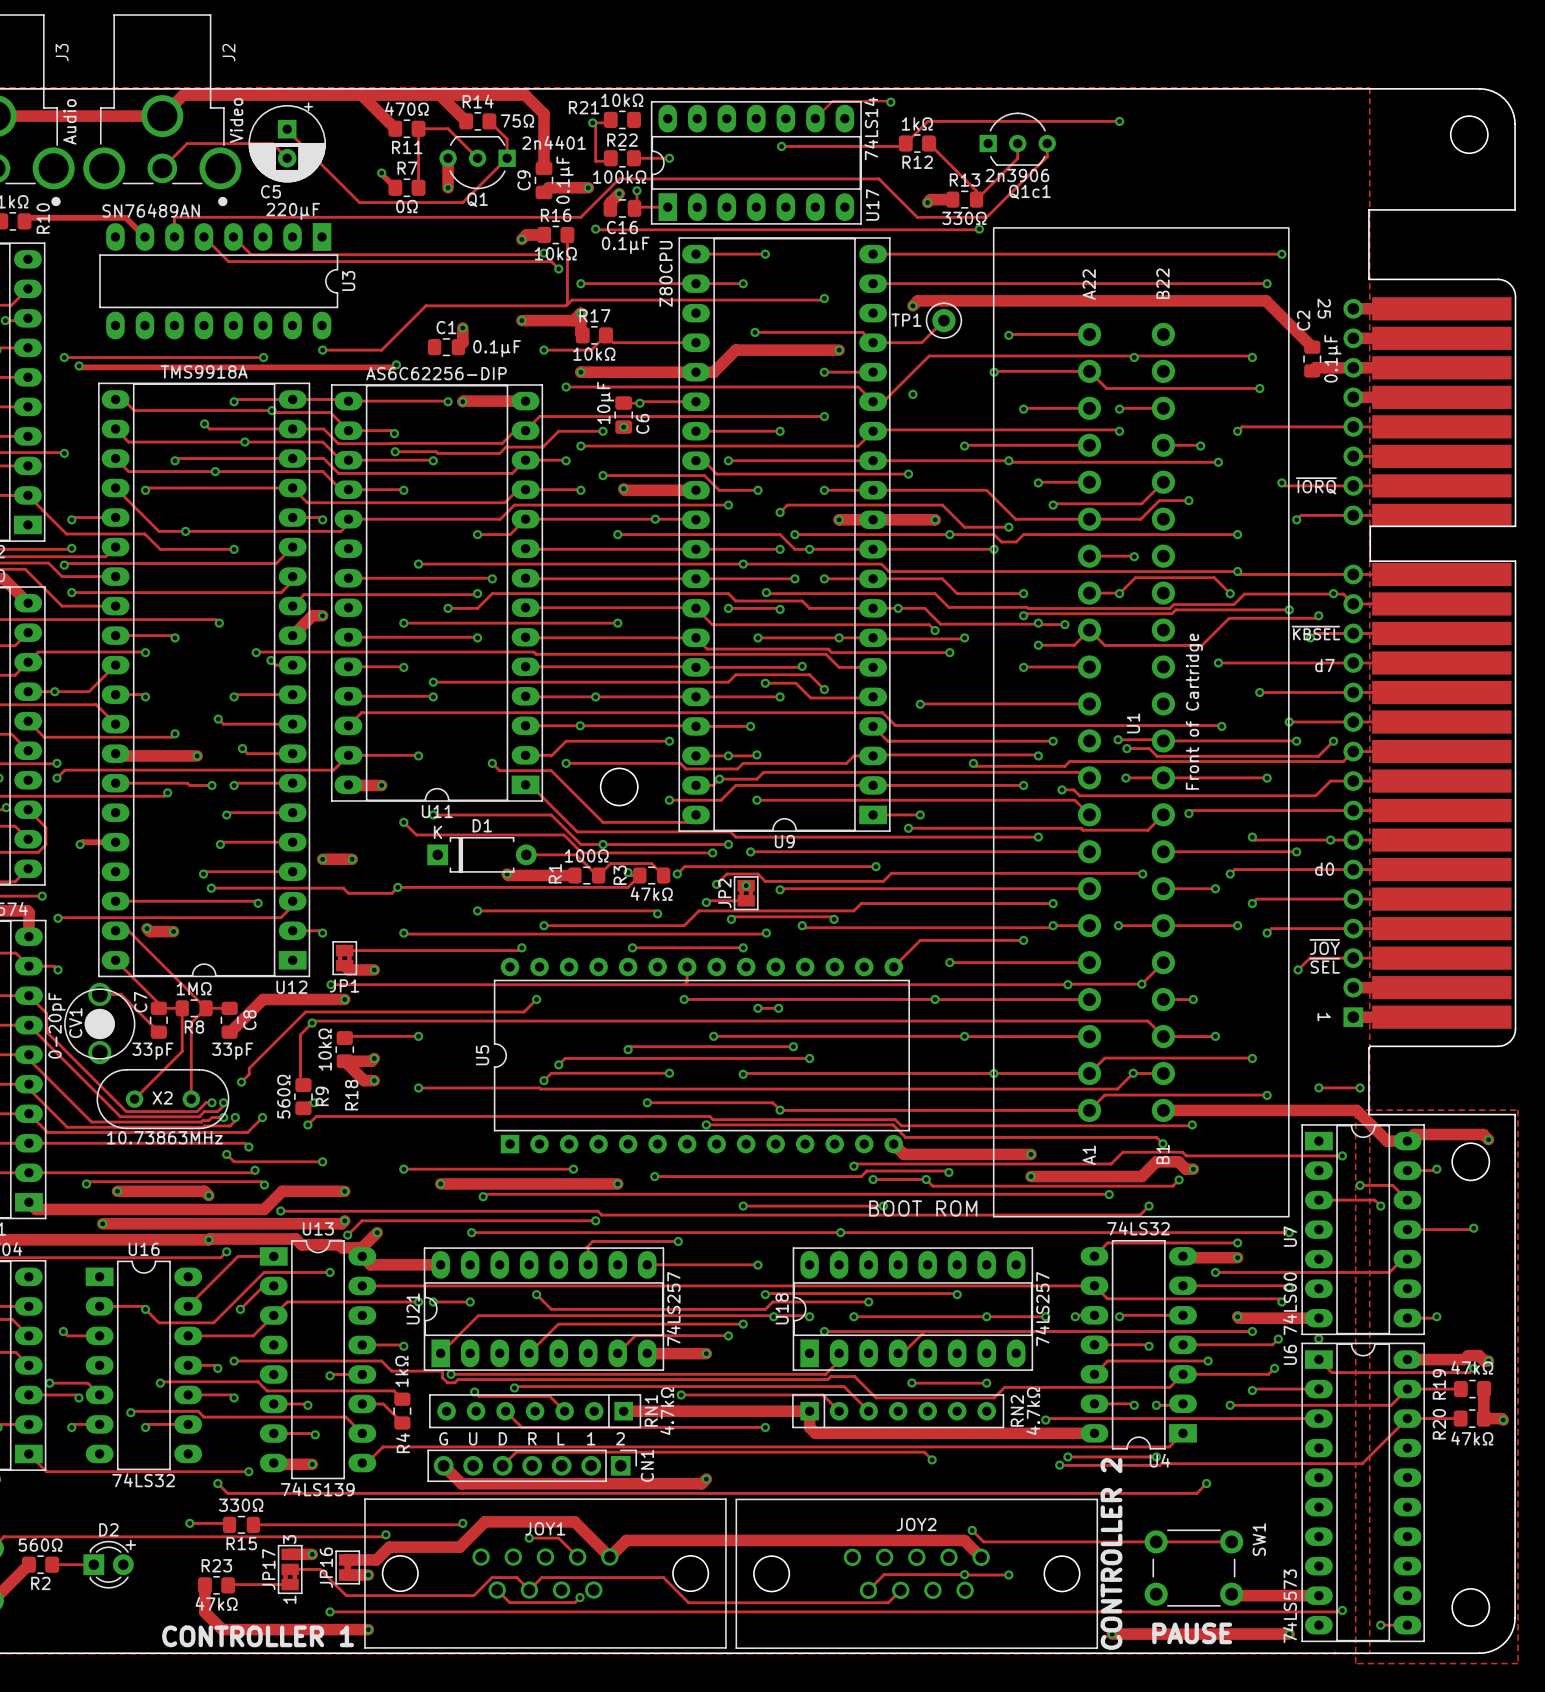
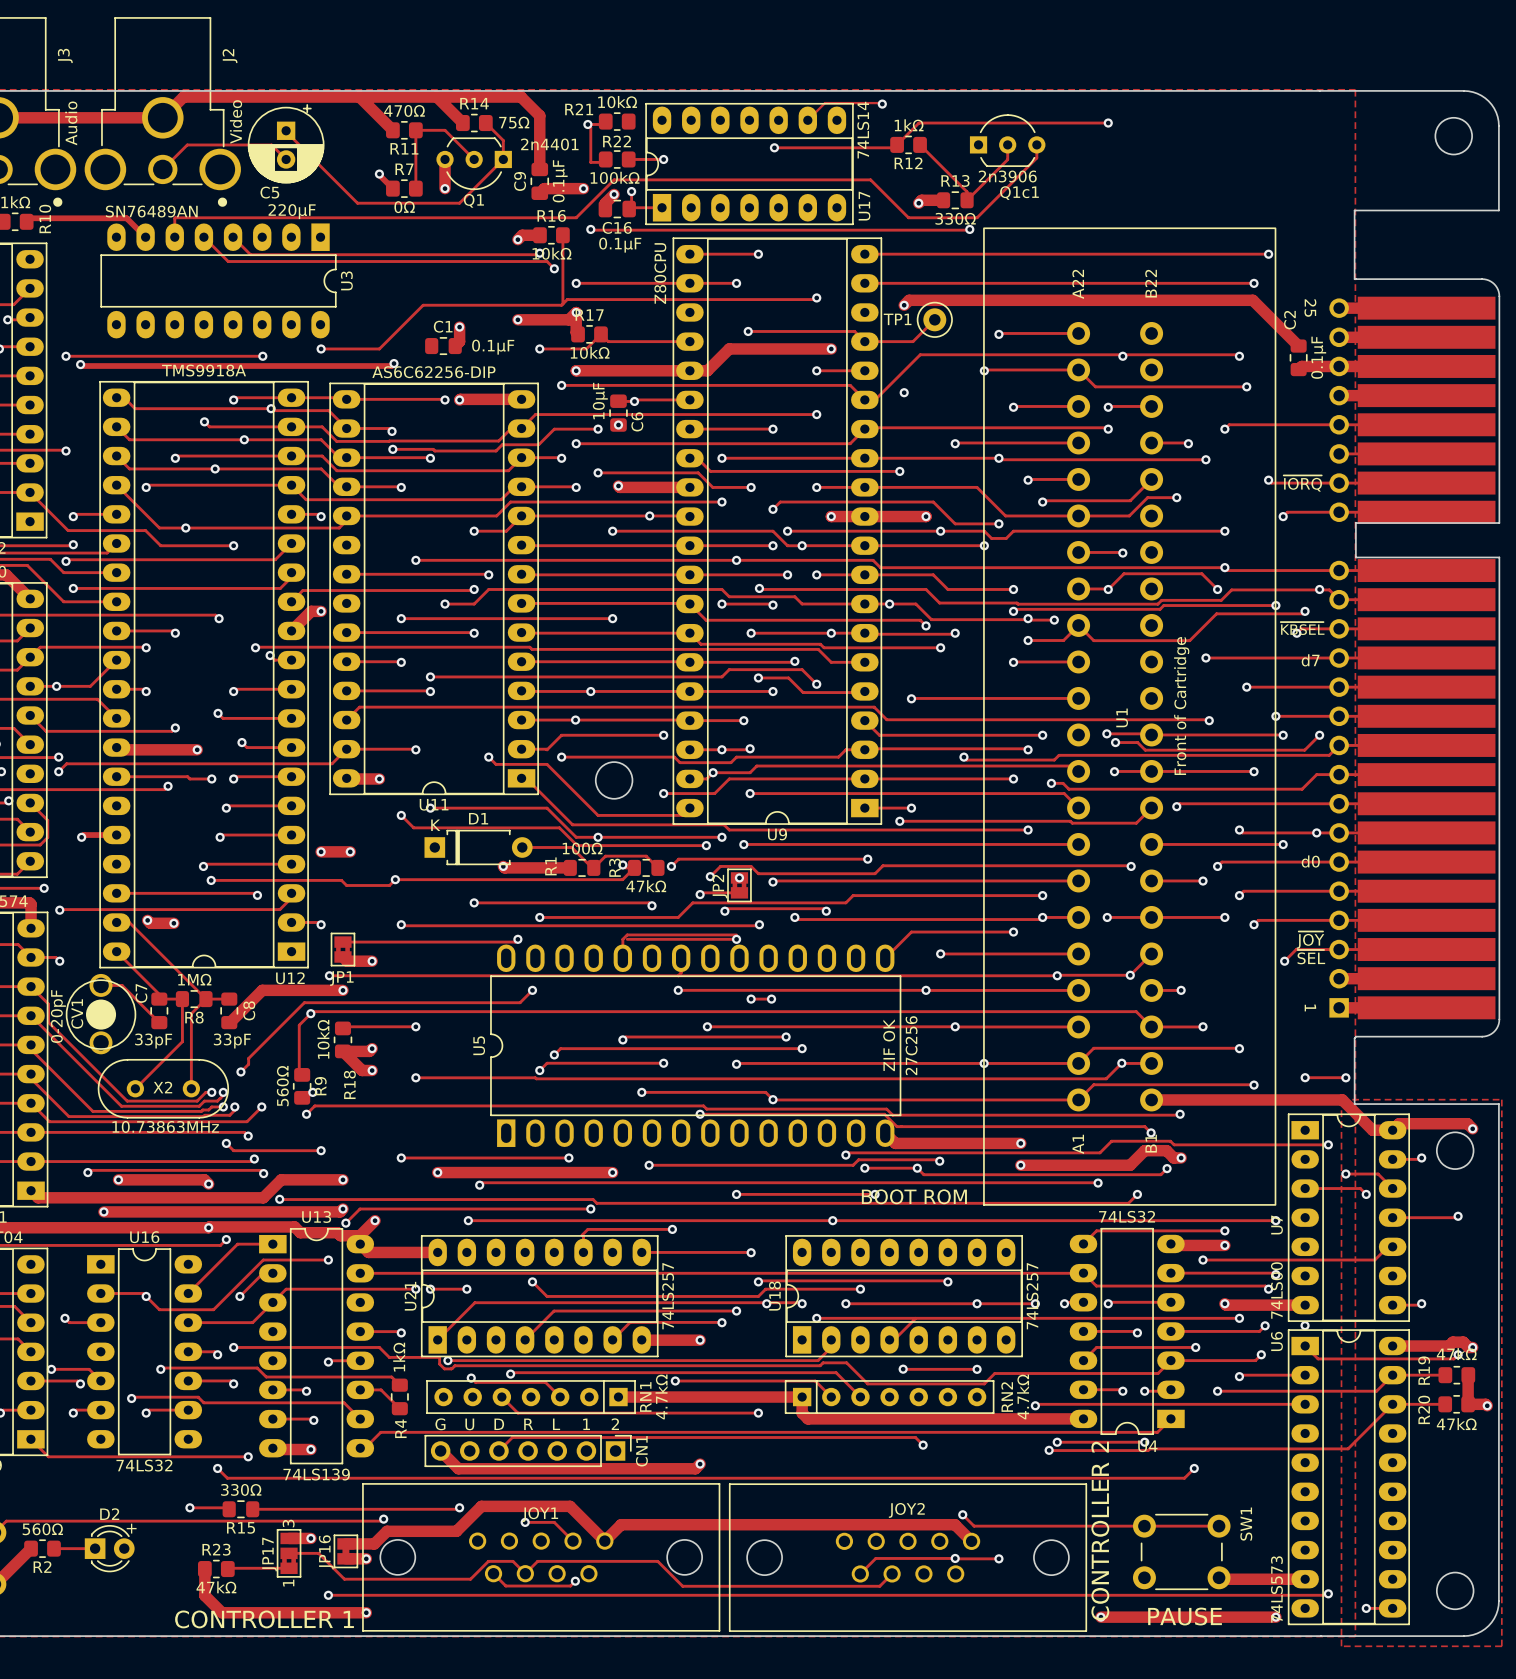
track: none -> (736, 934) (627, 934) (622, 939) (622, 958)
via: (632, 947) -> none
U5 footprint: [493, 957, 910, 1154] -> [490, 944, 902, 1147]
text: none -> ZIF OK (889, 1045)
U5 value: none -> 27C256 (911, 1045)

